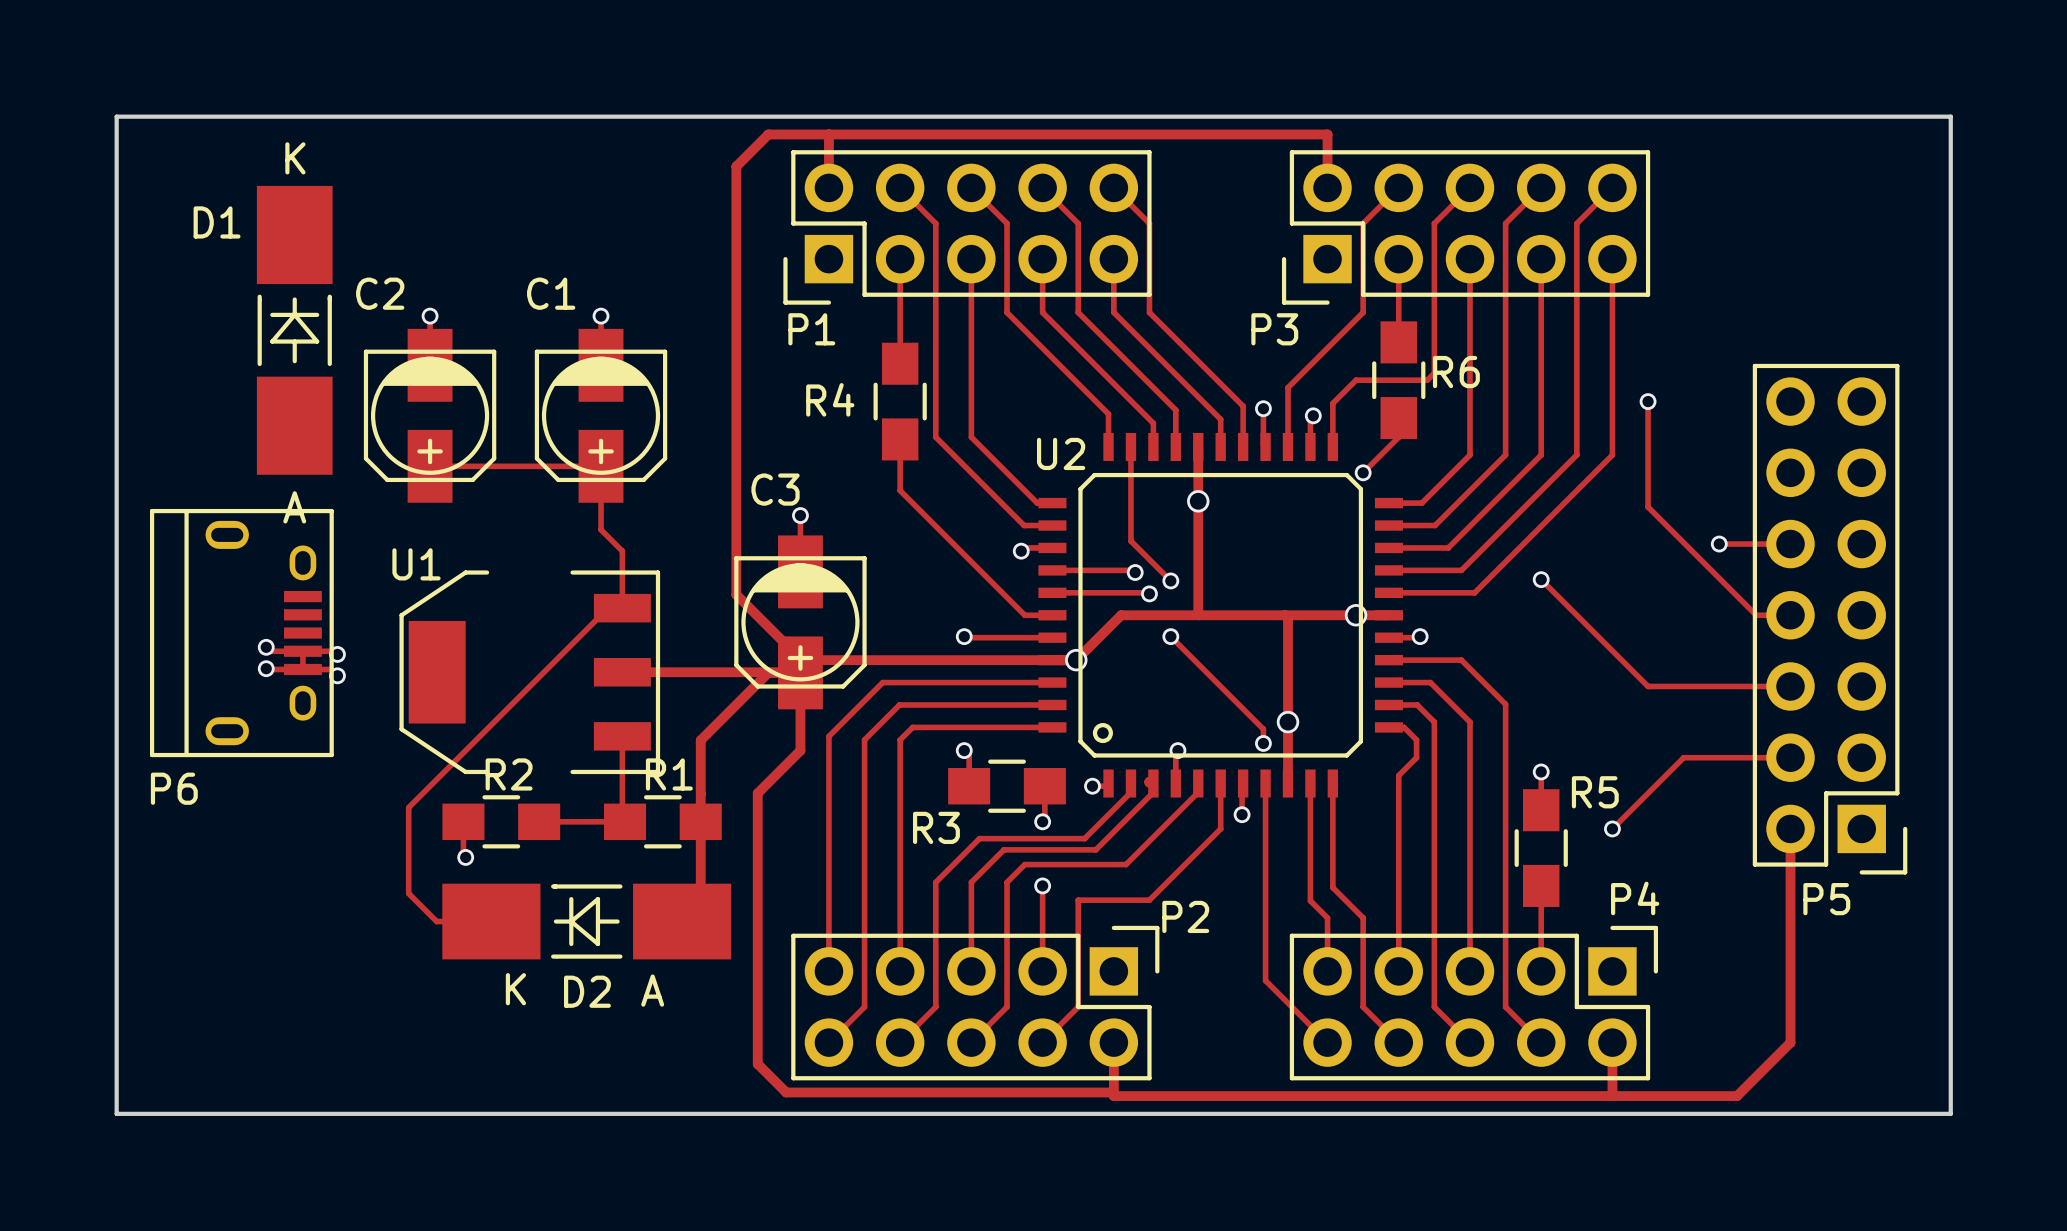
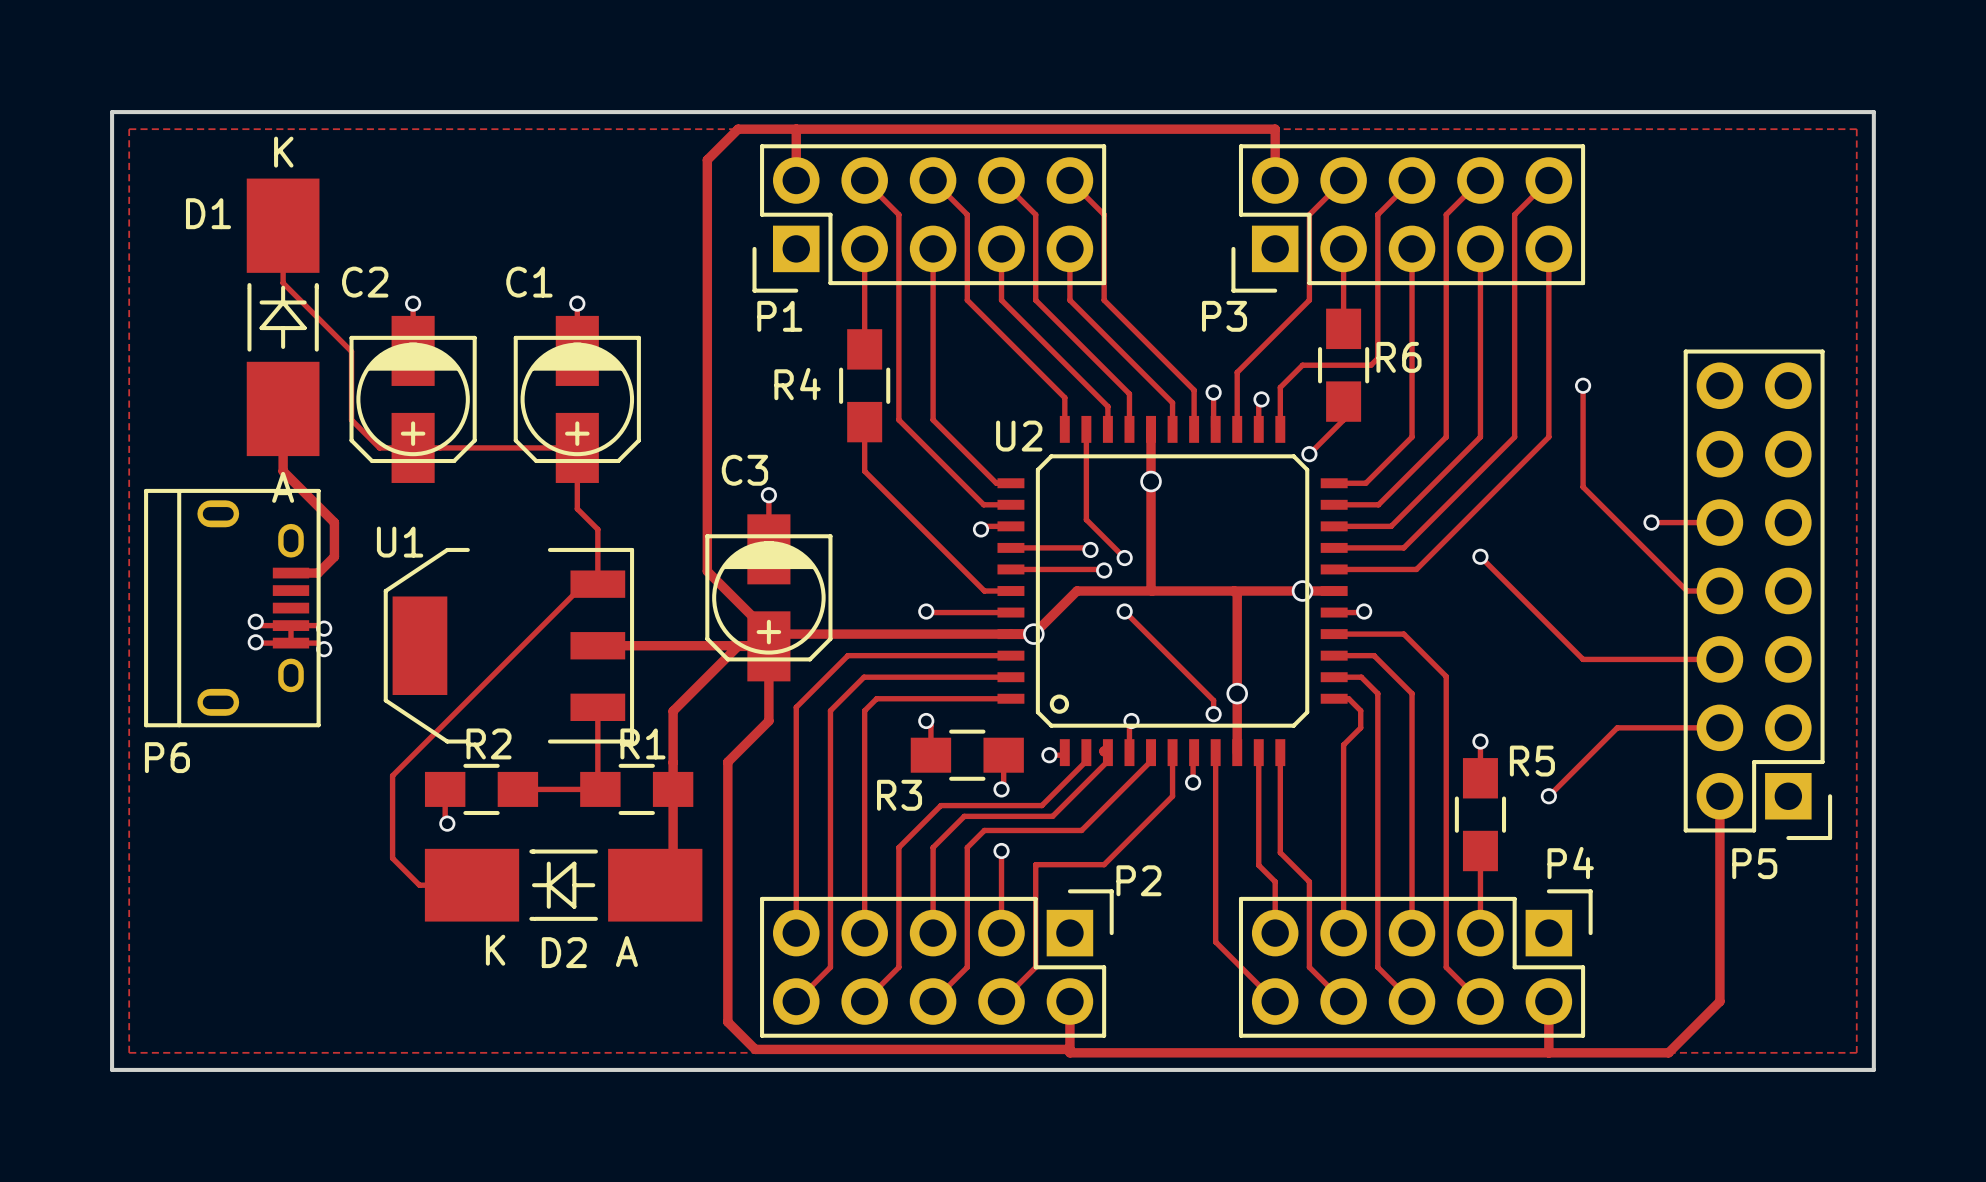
zone outline: none -> (129, 129) (129, 1052) (1856, 1052) (1856, 129) (129, 129)
track: none -> (283, 225) (283, 283) (351, 351) (351, 419) (379, 447) (413, 447)
track: none -> (283, 408) (283, 471) (334, 522) (334, 556) (318, 573) (291, 573)

